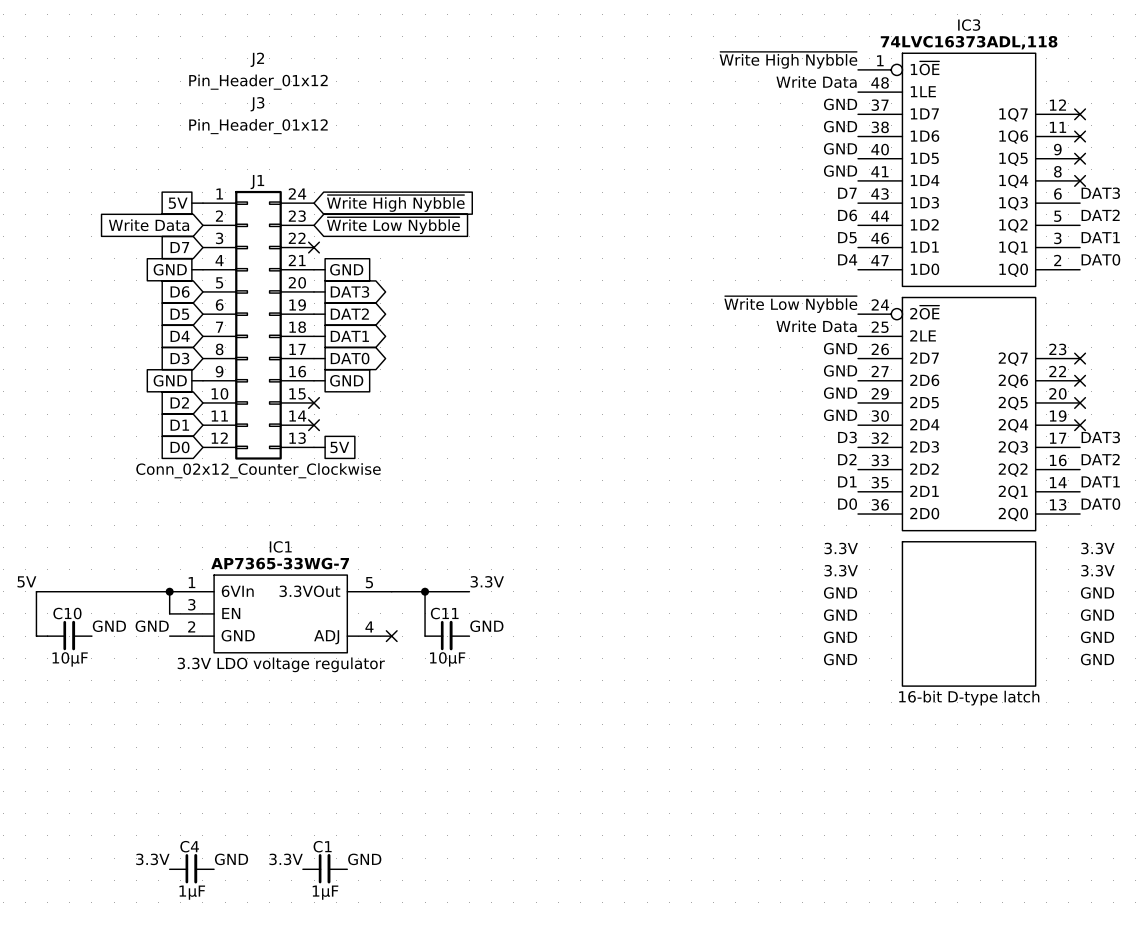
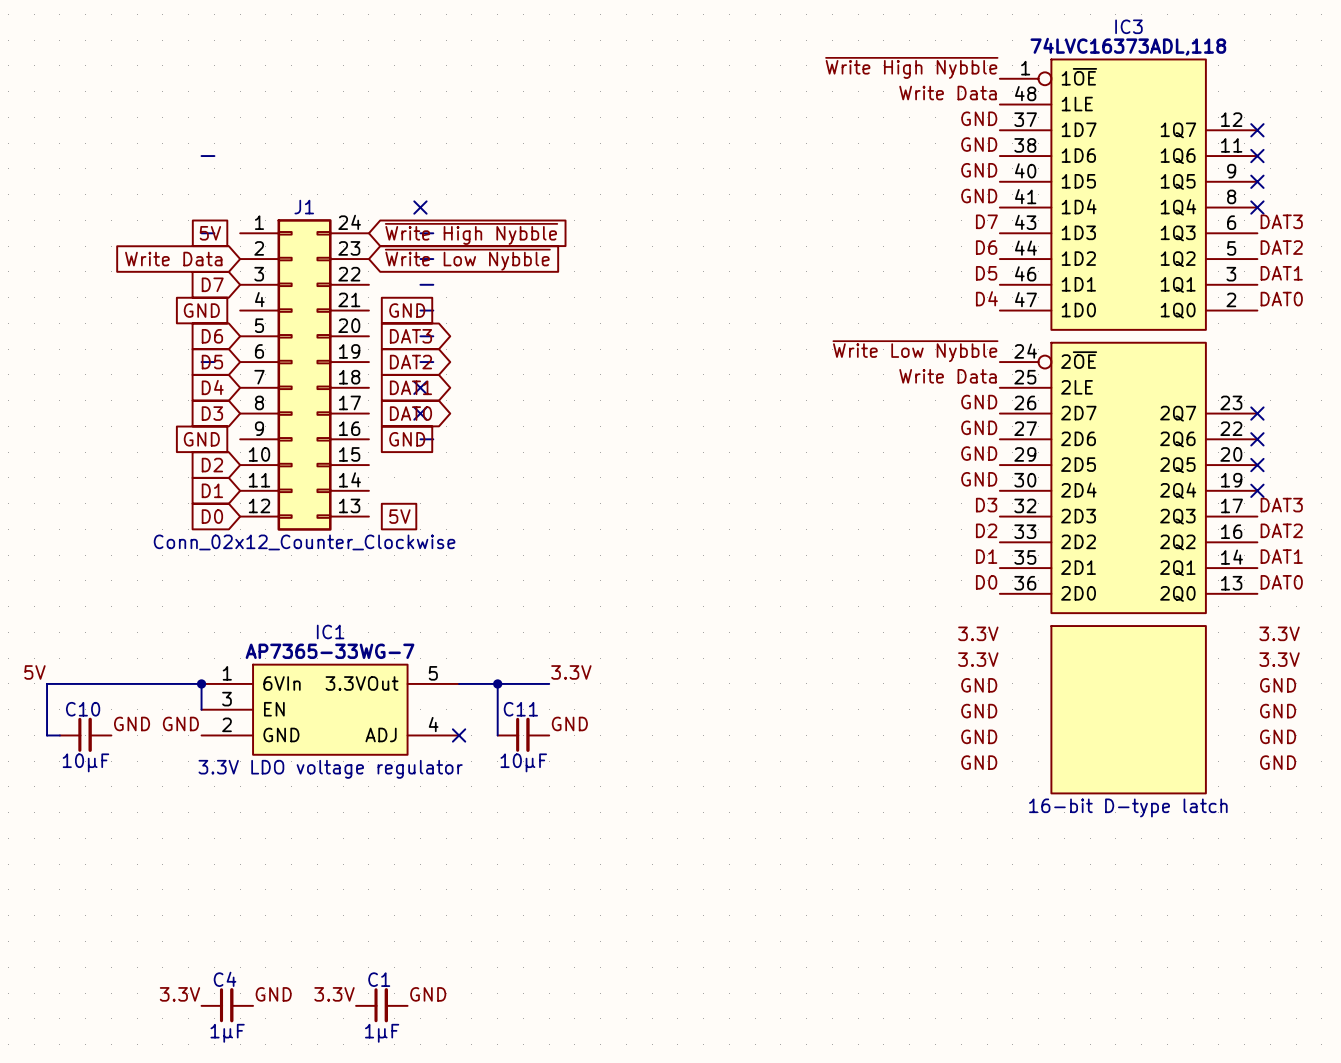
J2: Pin_Header_01x12 (258, 71) -> none
J3: Pin_Header_01x12 (258, 115) -> none
no-connect mark: none -> (420, 207)
wire: (191, 203) (202, 203) -> (201, 156) (214, 156)
no-connect mark: (314, 247) -> none
wire: (191, 269) (202, 269) -> (201, 233) (214, 233)
wire: (314, 269) (325, 269) -> (420, 233) (433, 233)
wire: (314, 291) (325, 291) -> (420, 259) (433, 259)
wire: (314, 314) (325, 314) -> (420, 284) (433, 284)
wire: (314, 336) (325, 336) -> (420, 310) (433, 310)
no-connect mark: none -> (420, 387)
wire: (314, 358) (325, 358) -> (420, 336) (433, 336)
no-connect mark: none -> (420, 413)
wire: (191, 380) (202, 380) -> (201, 362) (214, 362)
wire: (314, 380) (325, 380) -> (420, 362) (433, 362)
no-connect mark: (314, 402) -> none
no-connect mark: (314, 425) -> none
wire: (314, 447) (325, 447) -> (420, 439) (433, 439)

